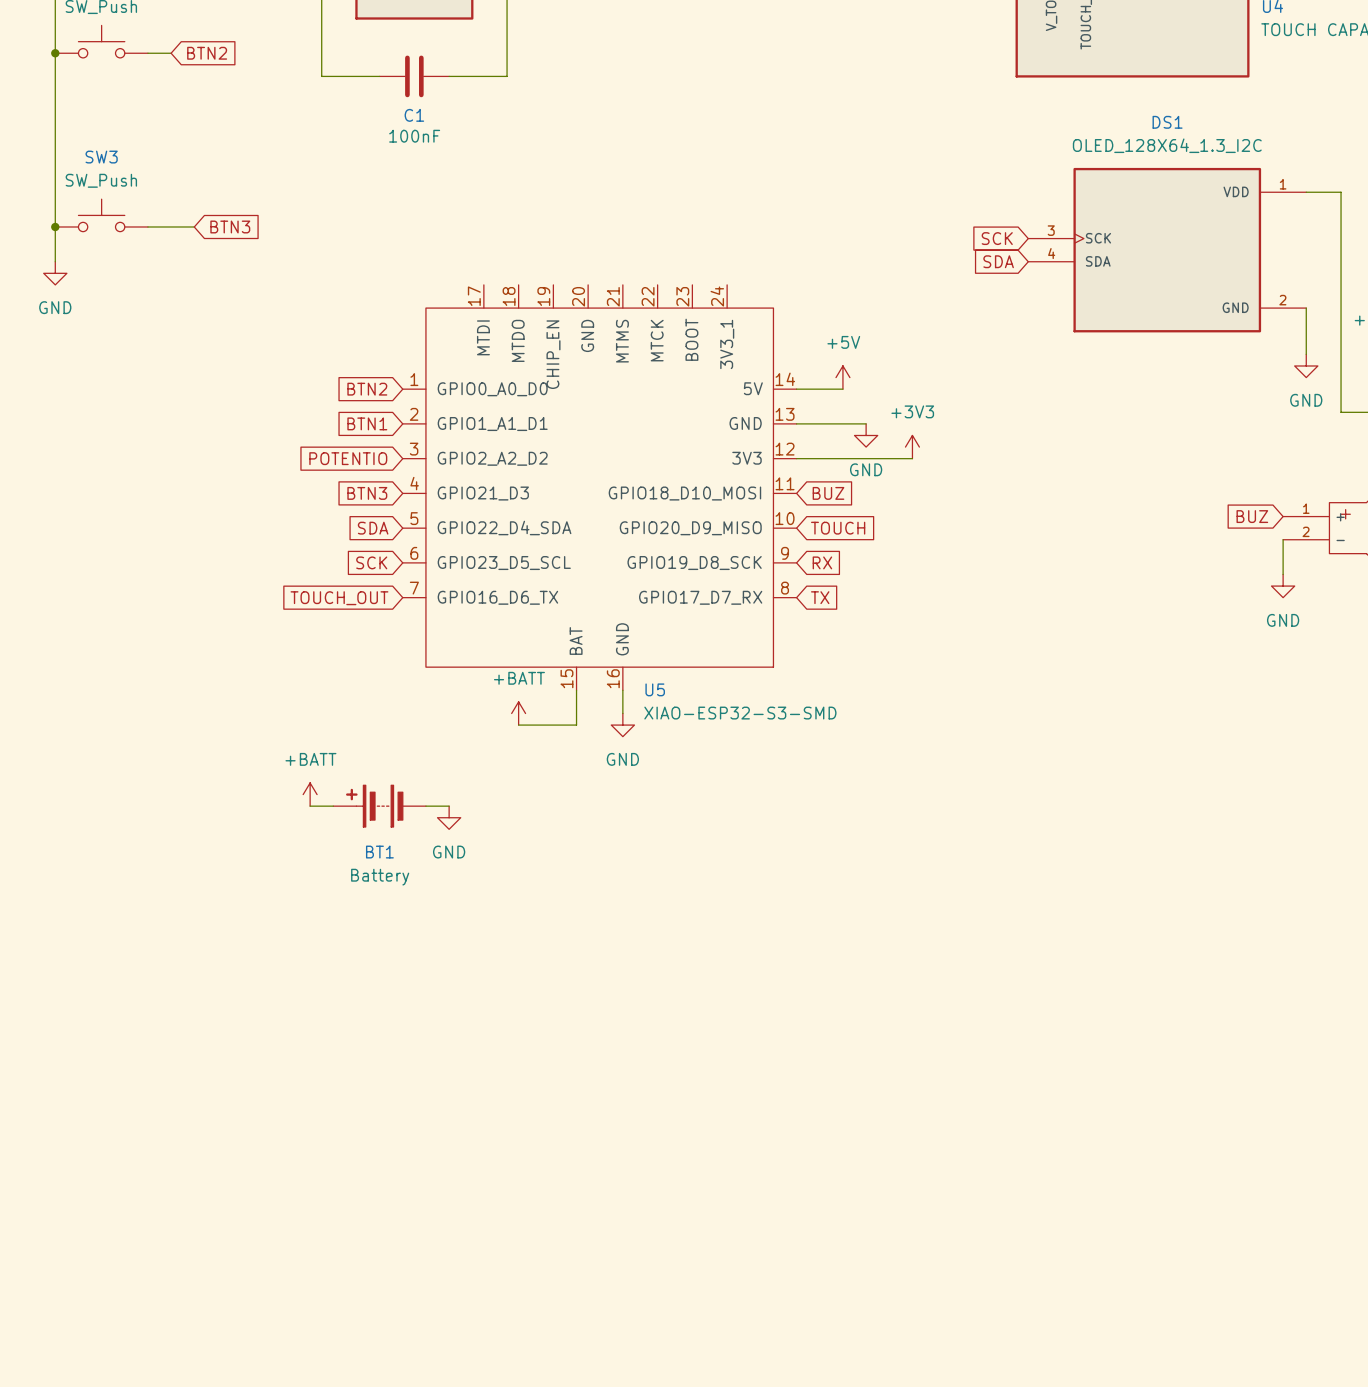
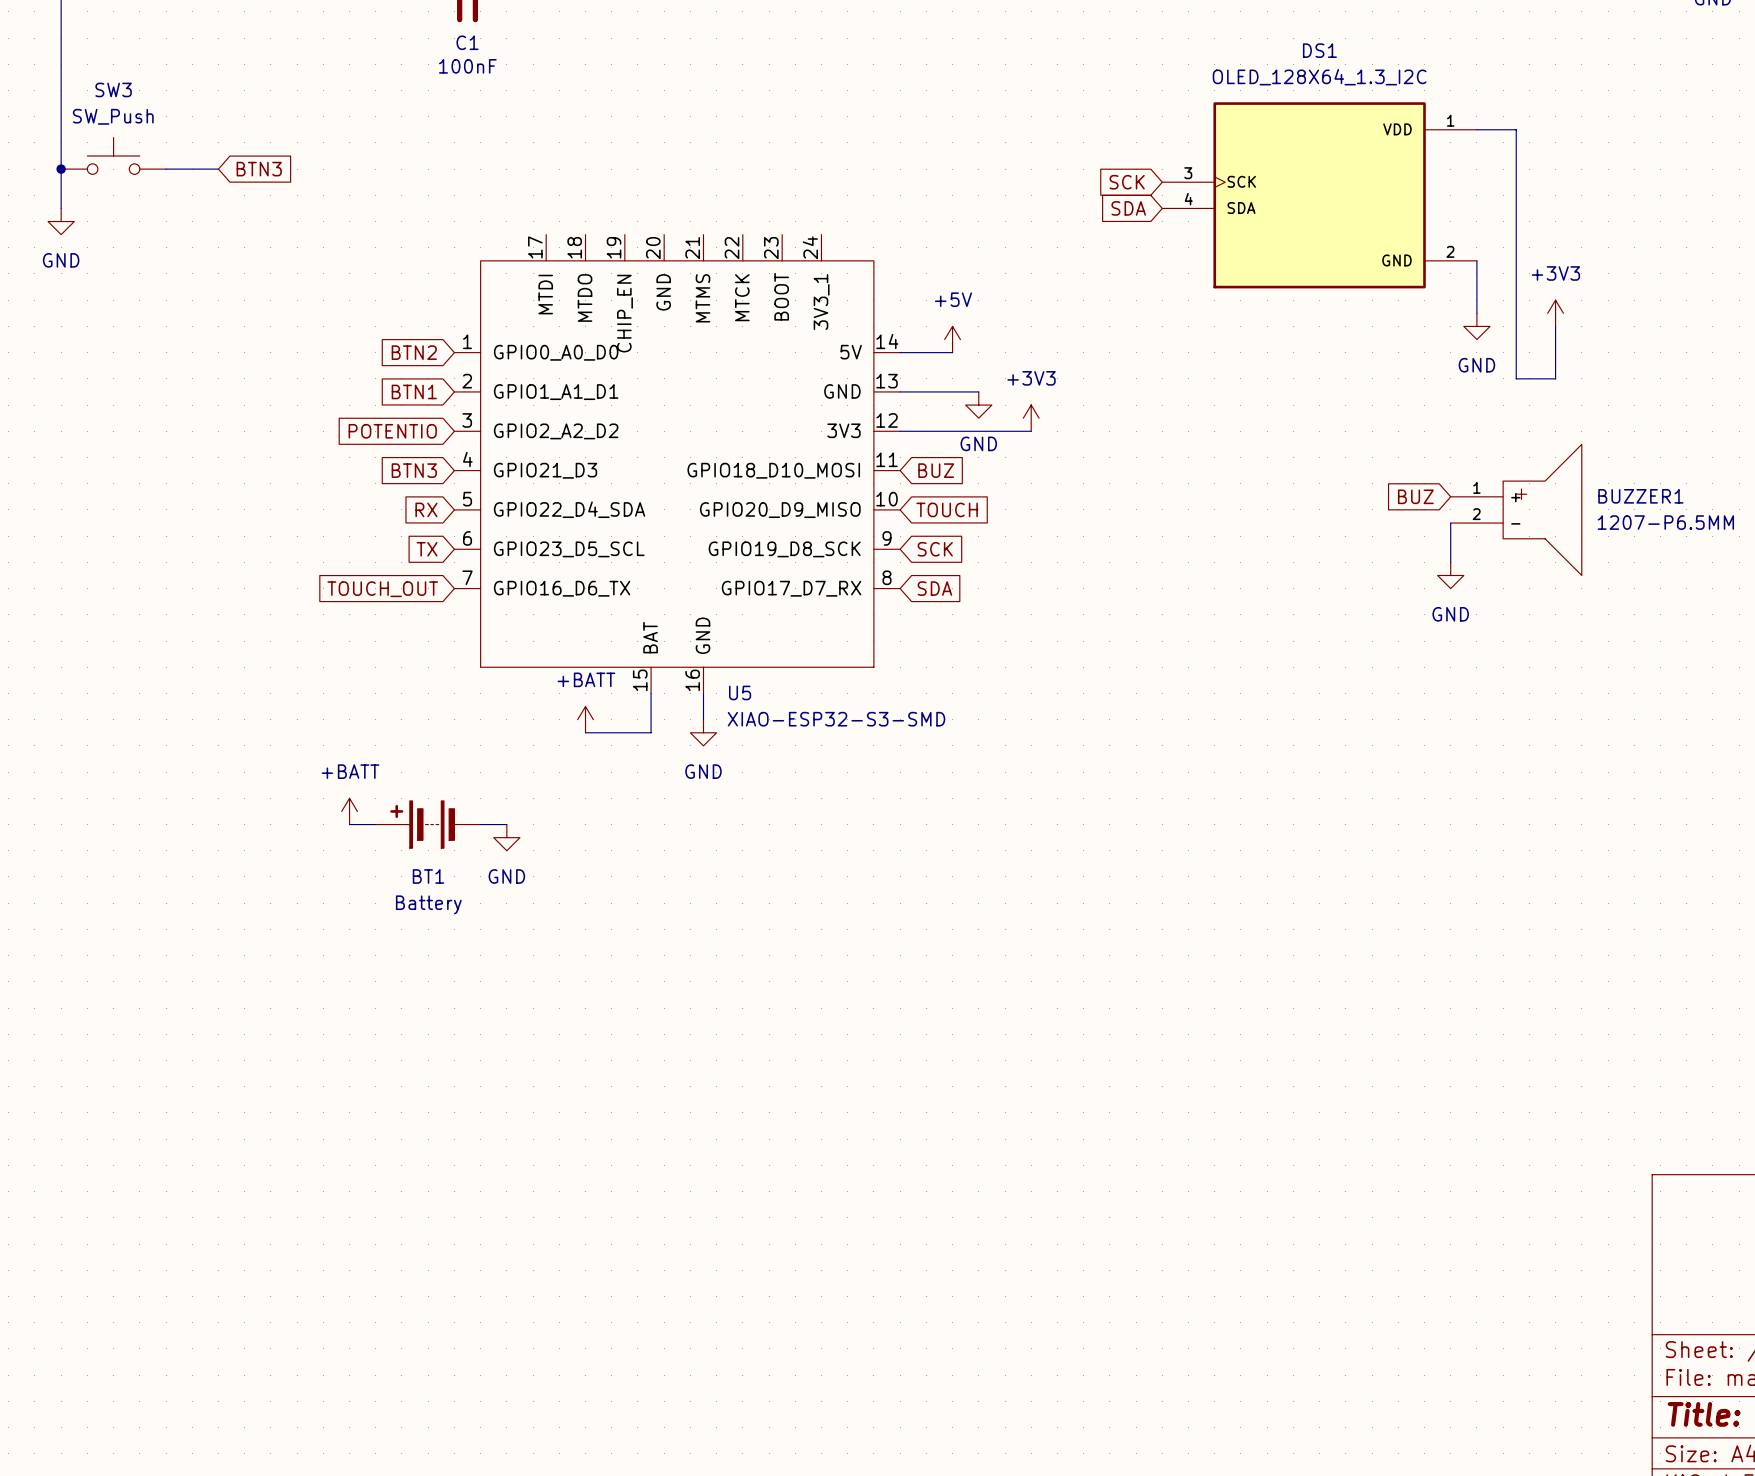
global label: SDA (373, 528) -> RX (426, 509)
global label: SCK (371, 562) -> TX (427, 549)
global label: RX (822, 562) -> SCK (935, 549)
global label: TX (820, 597) -> SDA (934, 588)

